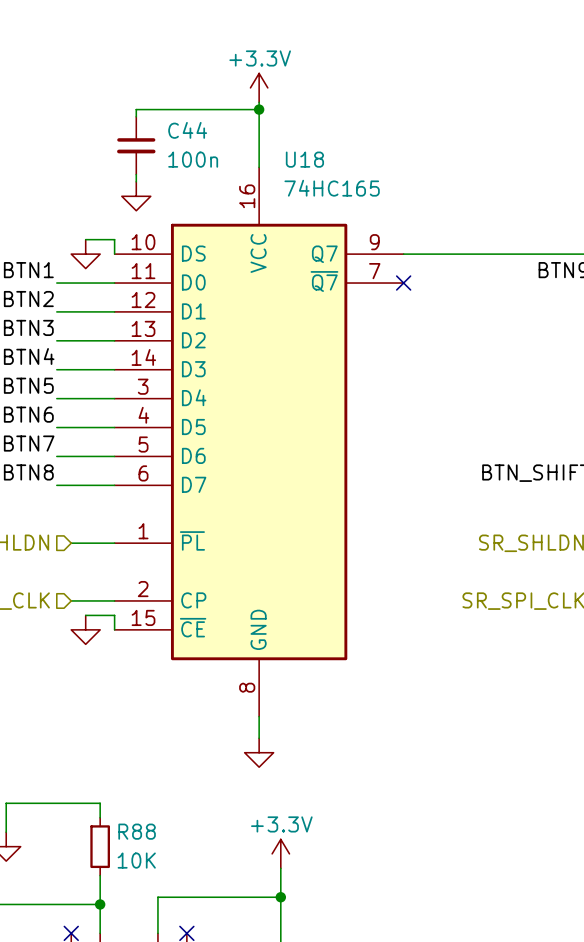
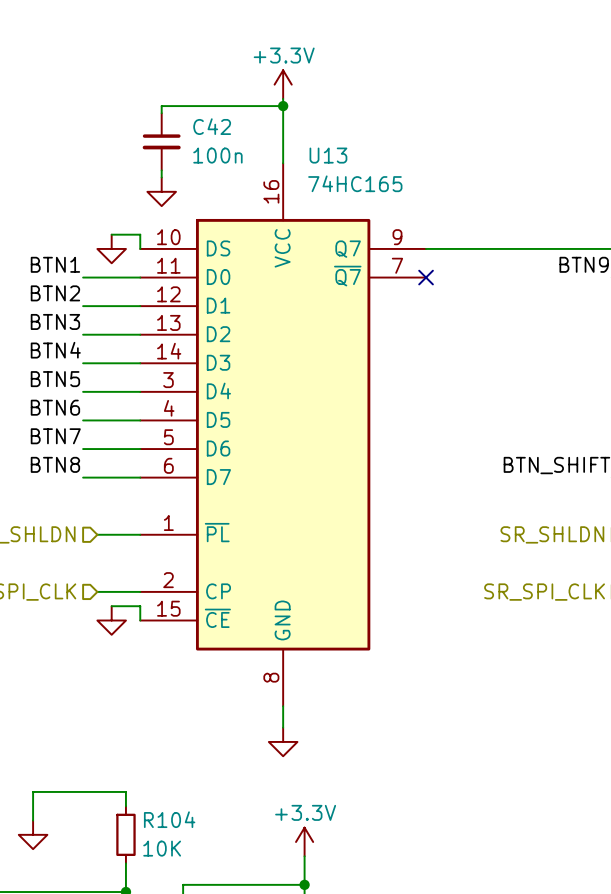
C44 name: C44 (187, 130) -> C42 (212, 126)
U18 name: U18 (304, 159) -> U13 (328, 155)
R88 name: R88 (137, 831) -> R104 (169, 819)

